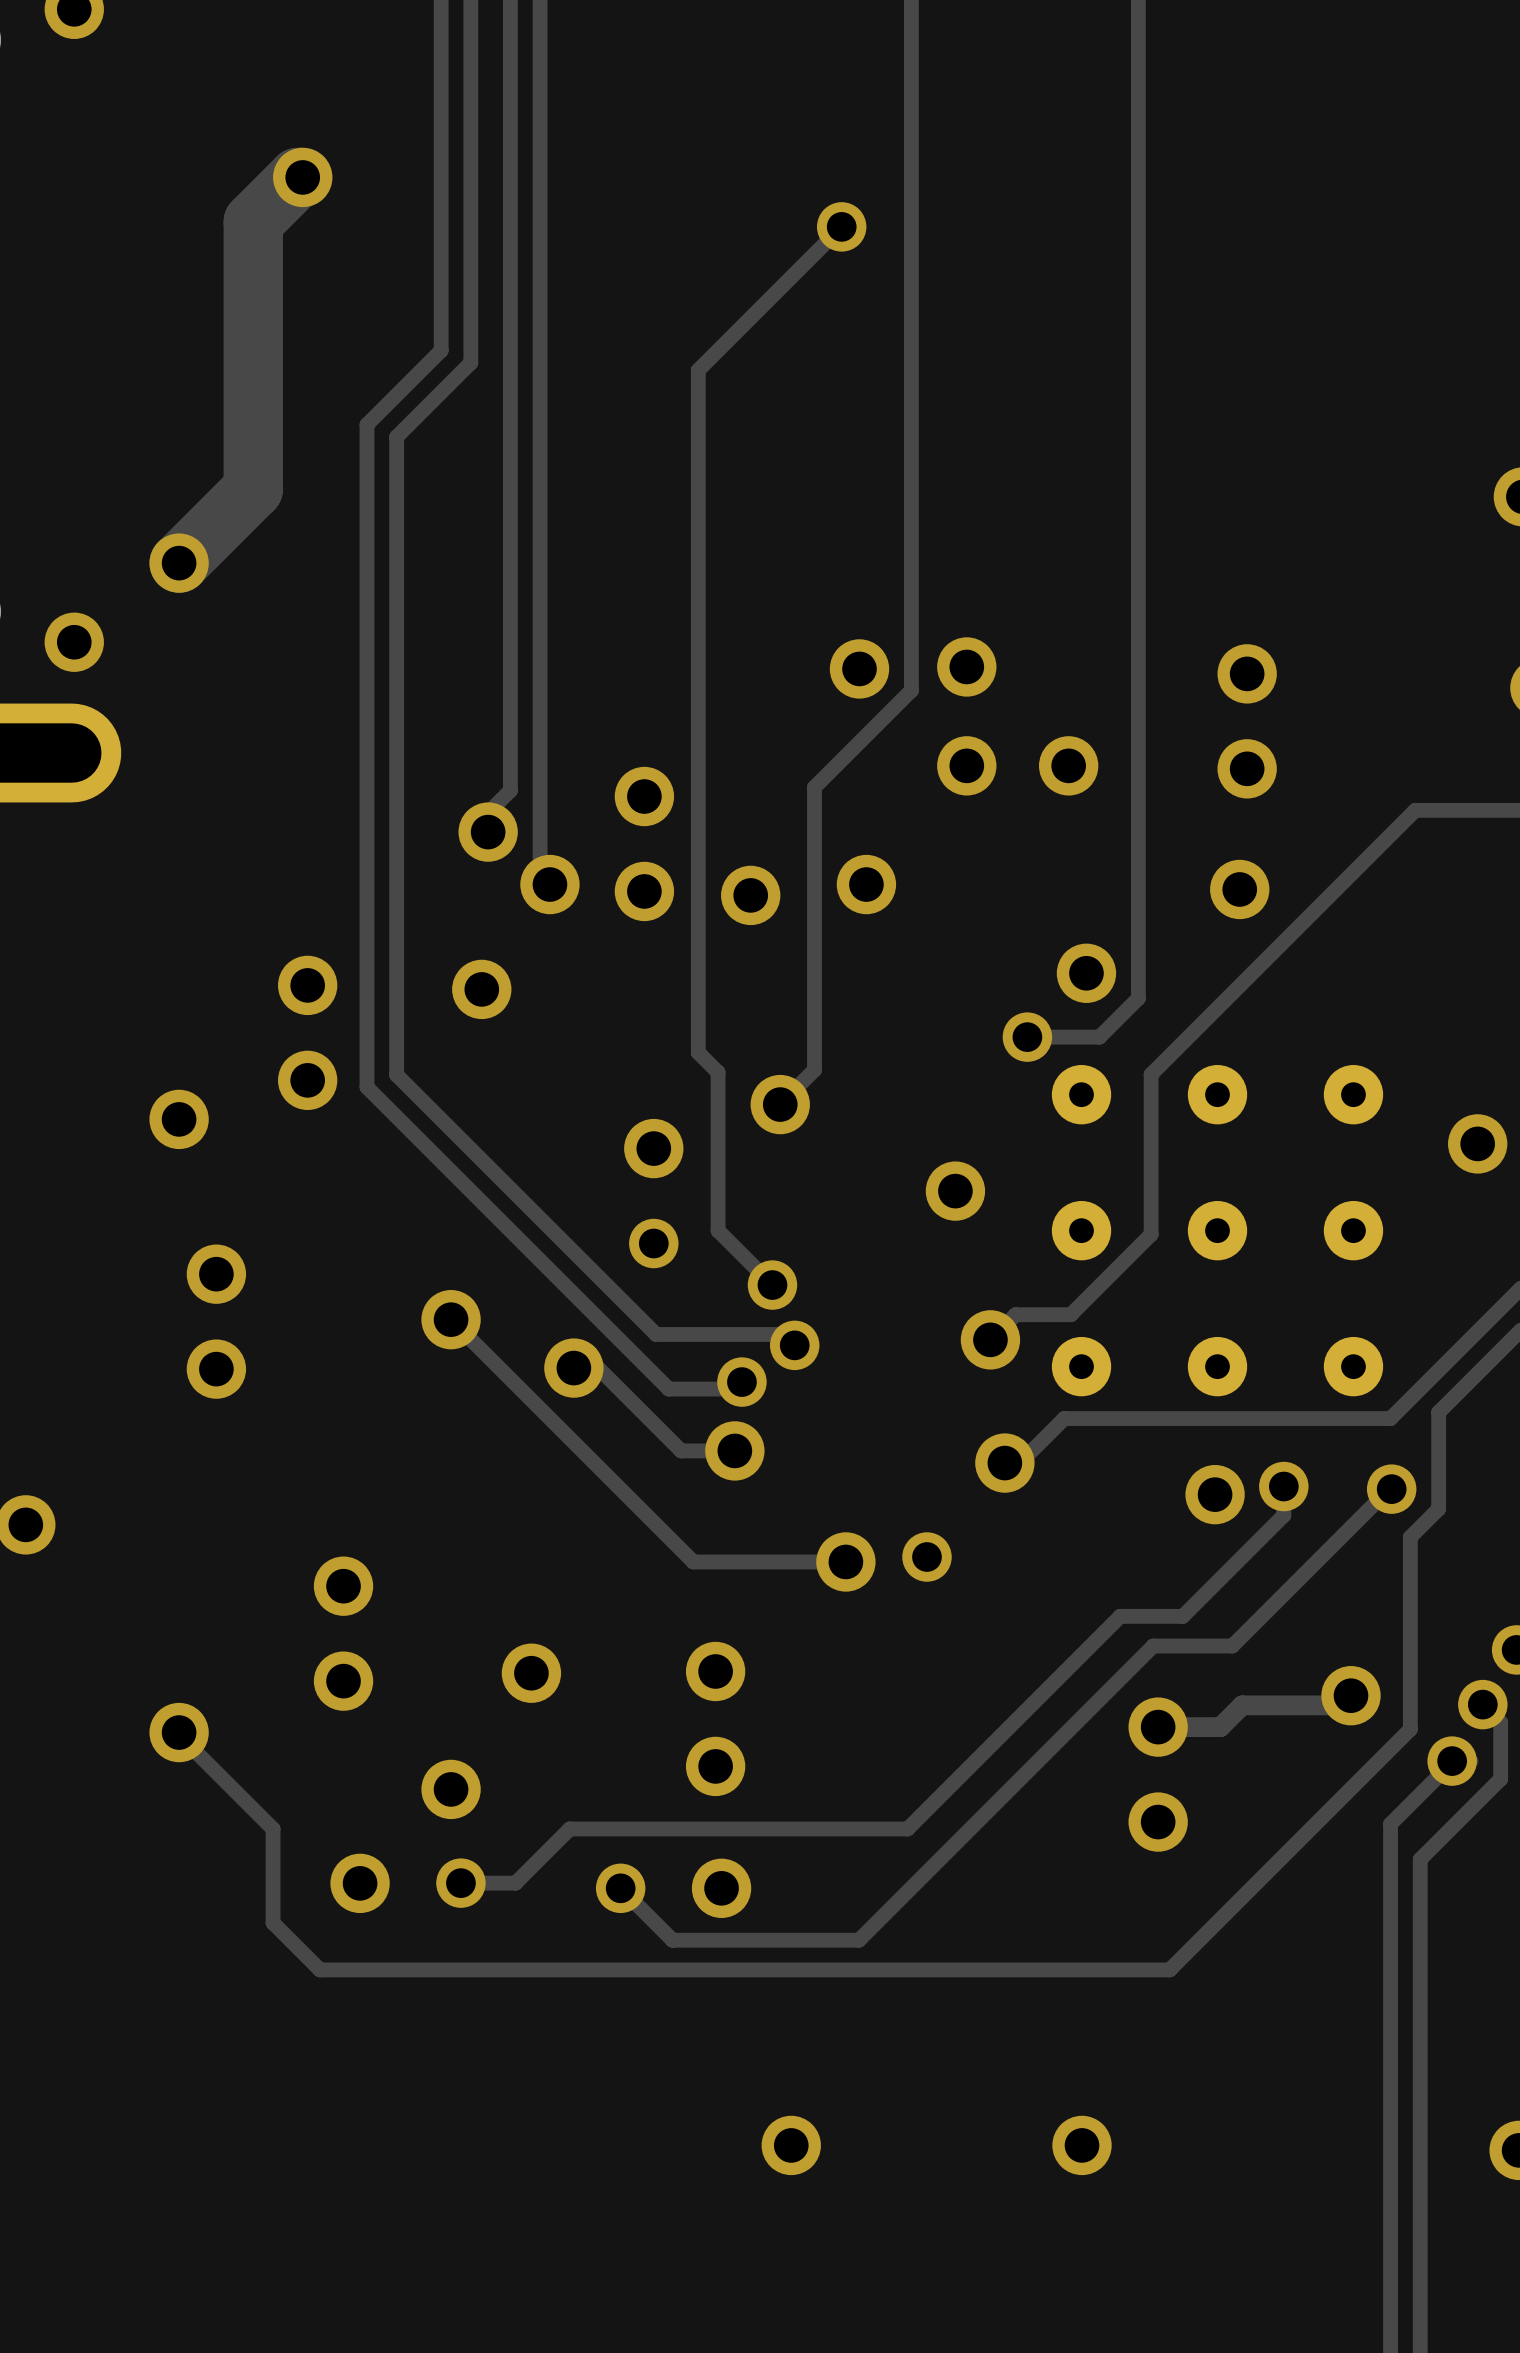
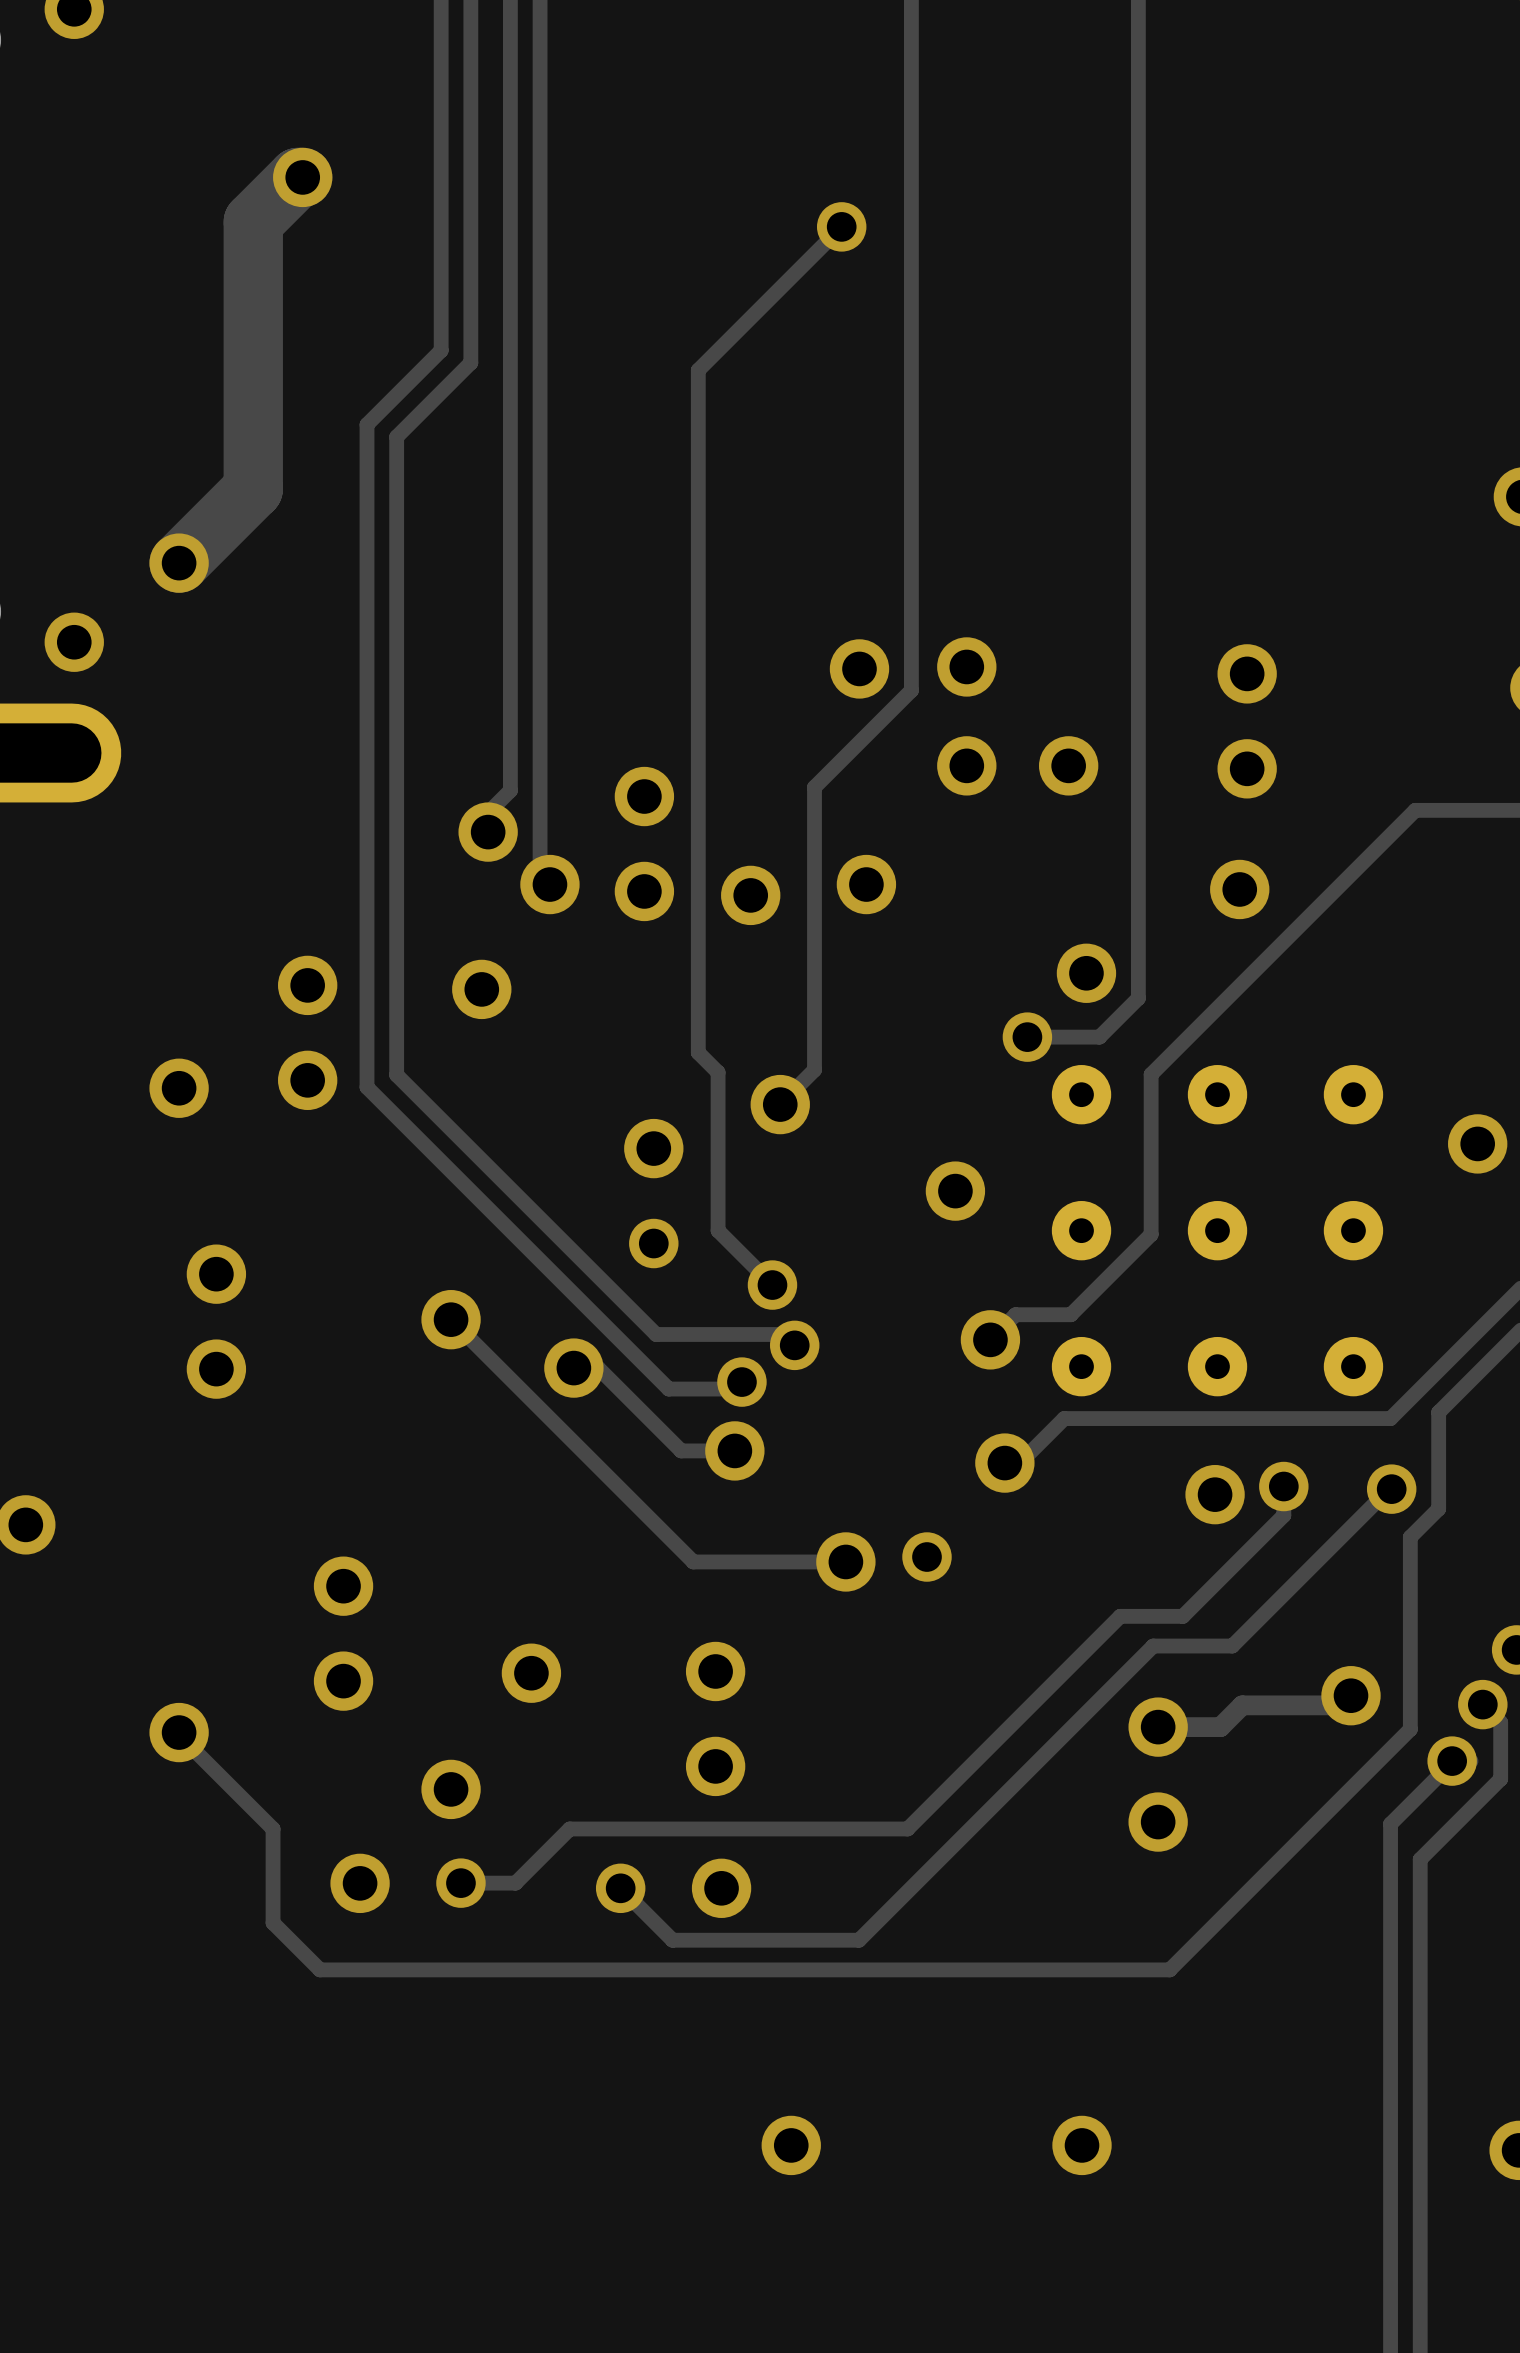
via position: (179, 1119) -> (179, 1088)

